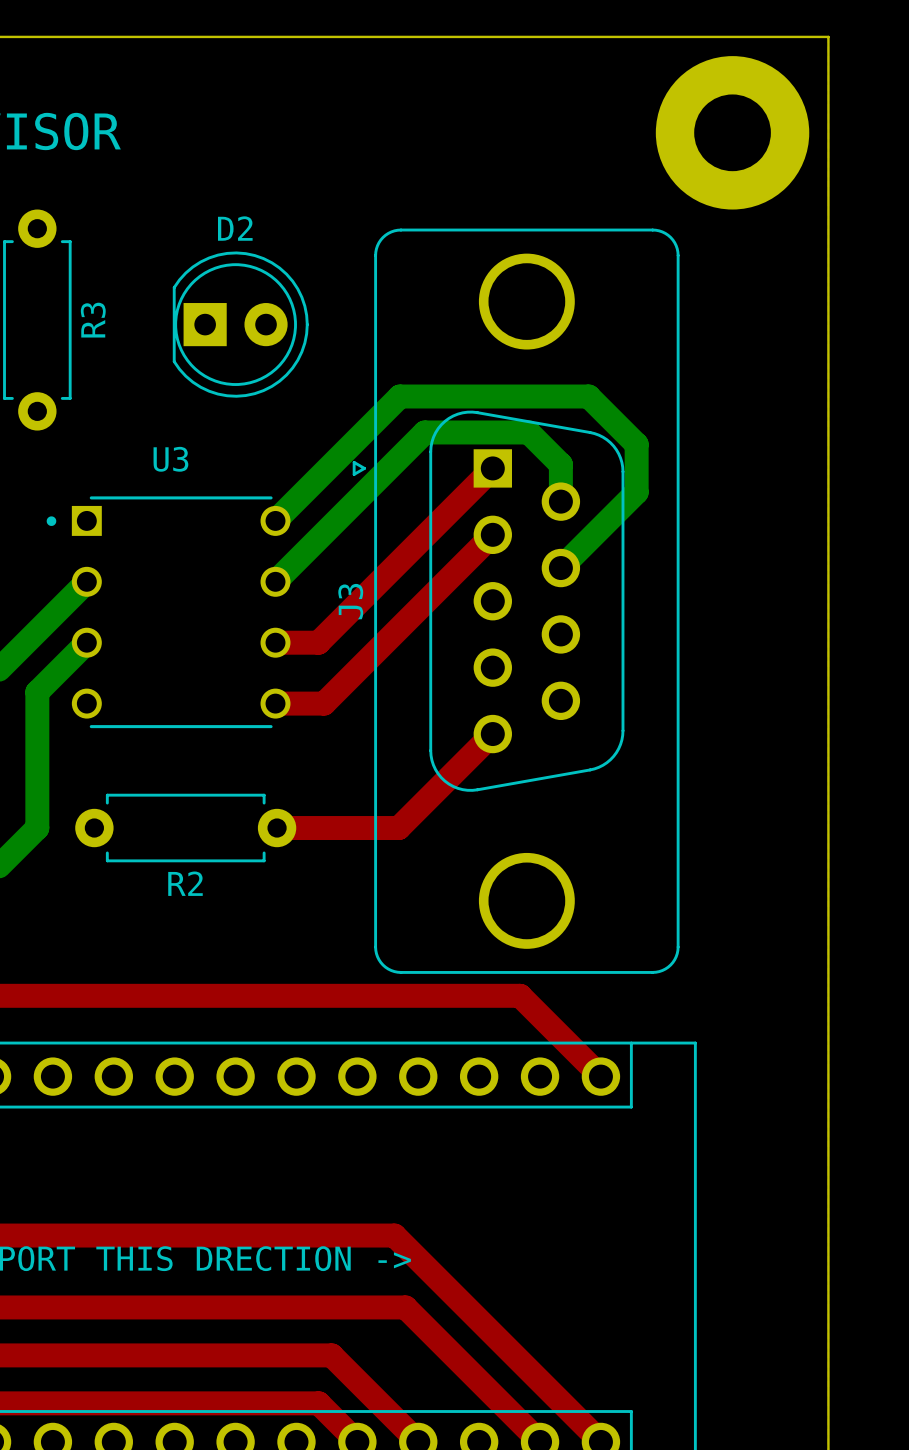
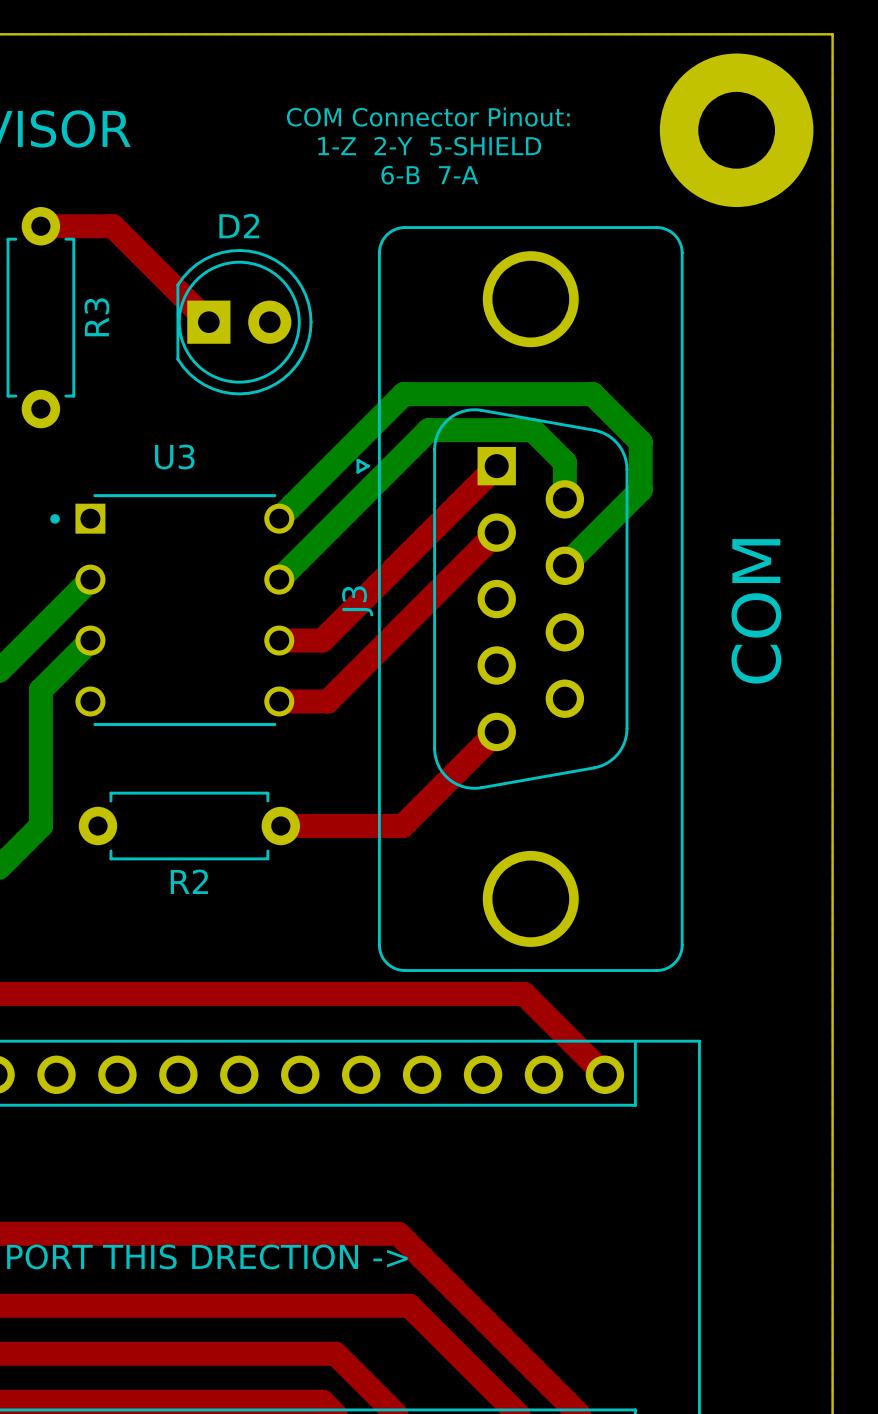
text: none -> COM Connector Pinout: (428, 117)
text: none -> 1-Z 2-Y 5-SHIELD (429, 146)
text: none -> 6-B 7-A (429, 175)
top track: none -> (40, 226) (112, 226) (208, 322)
text: none -> COM (756, 611)

